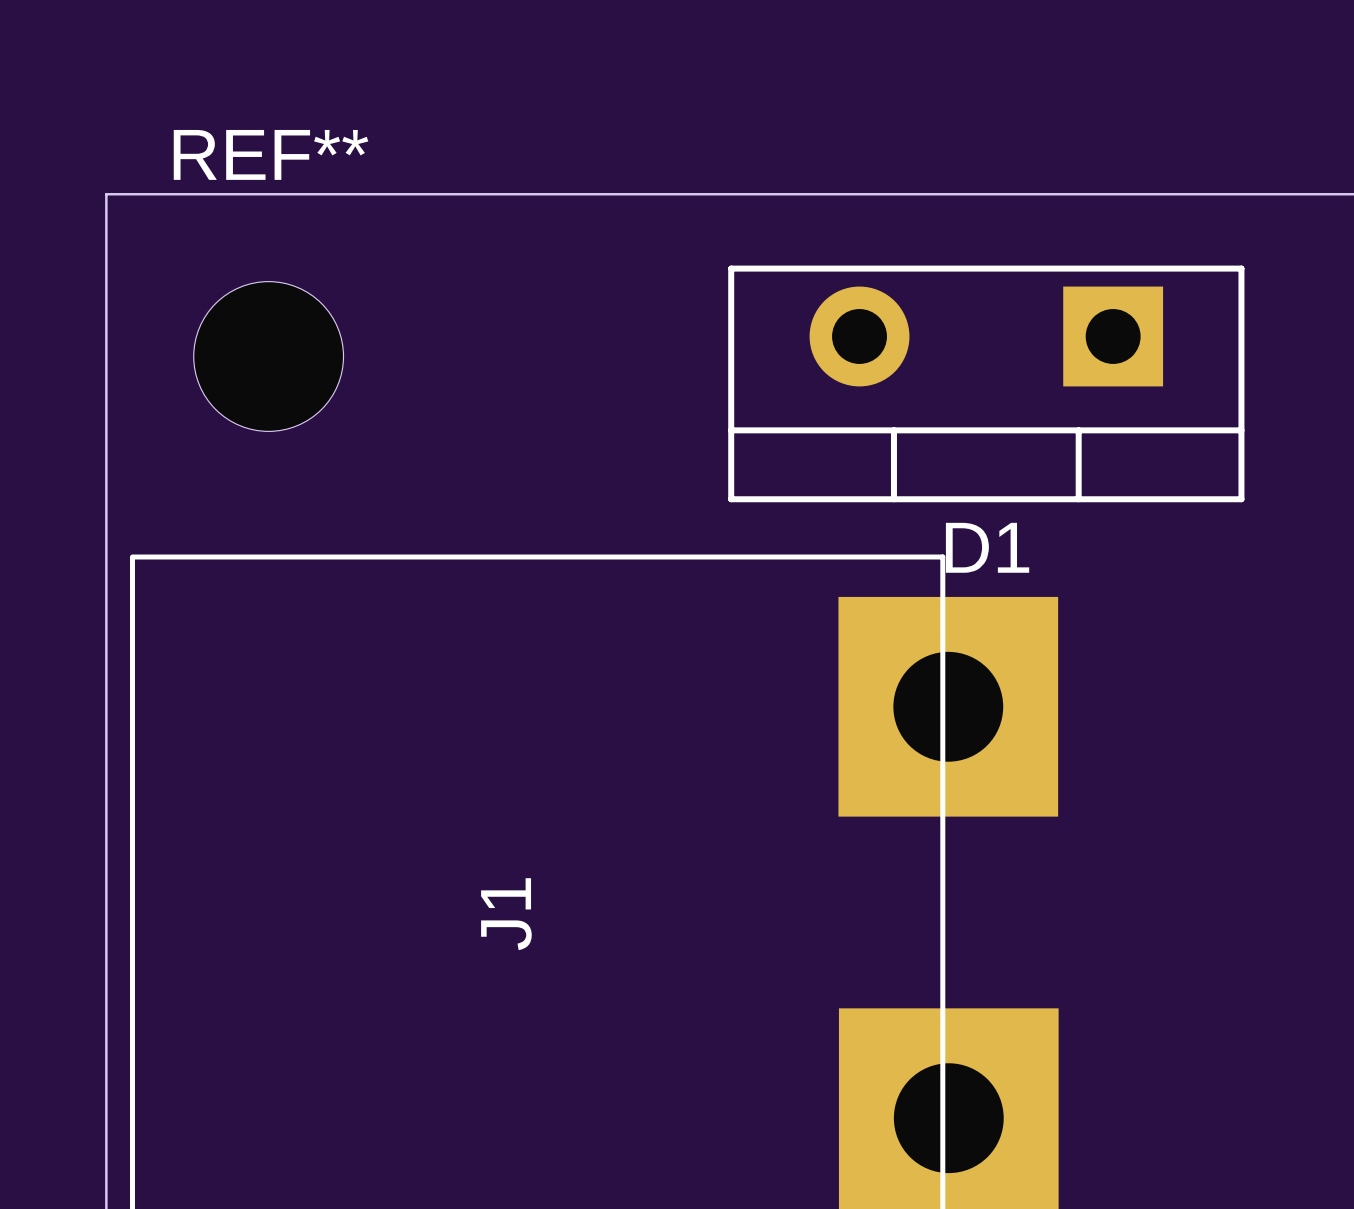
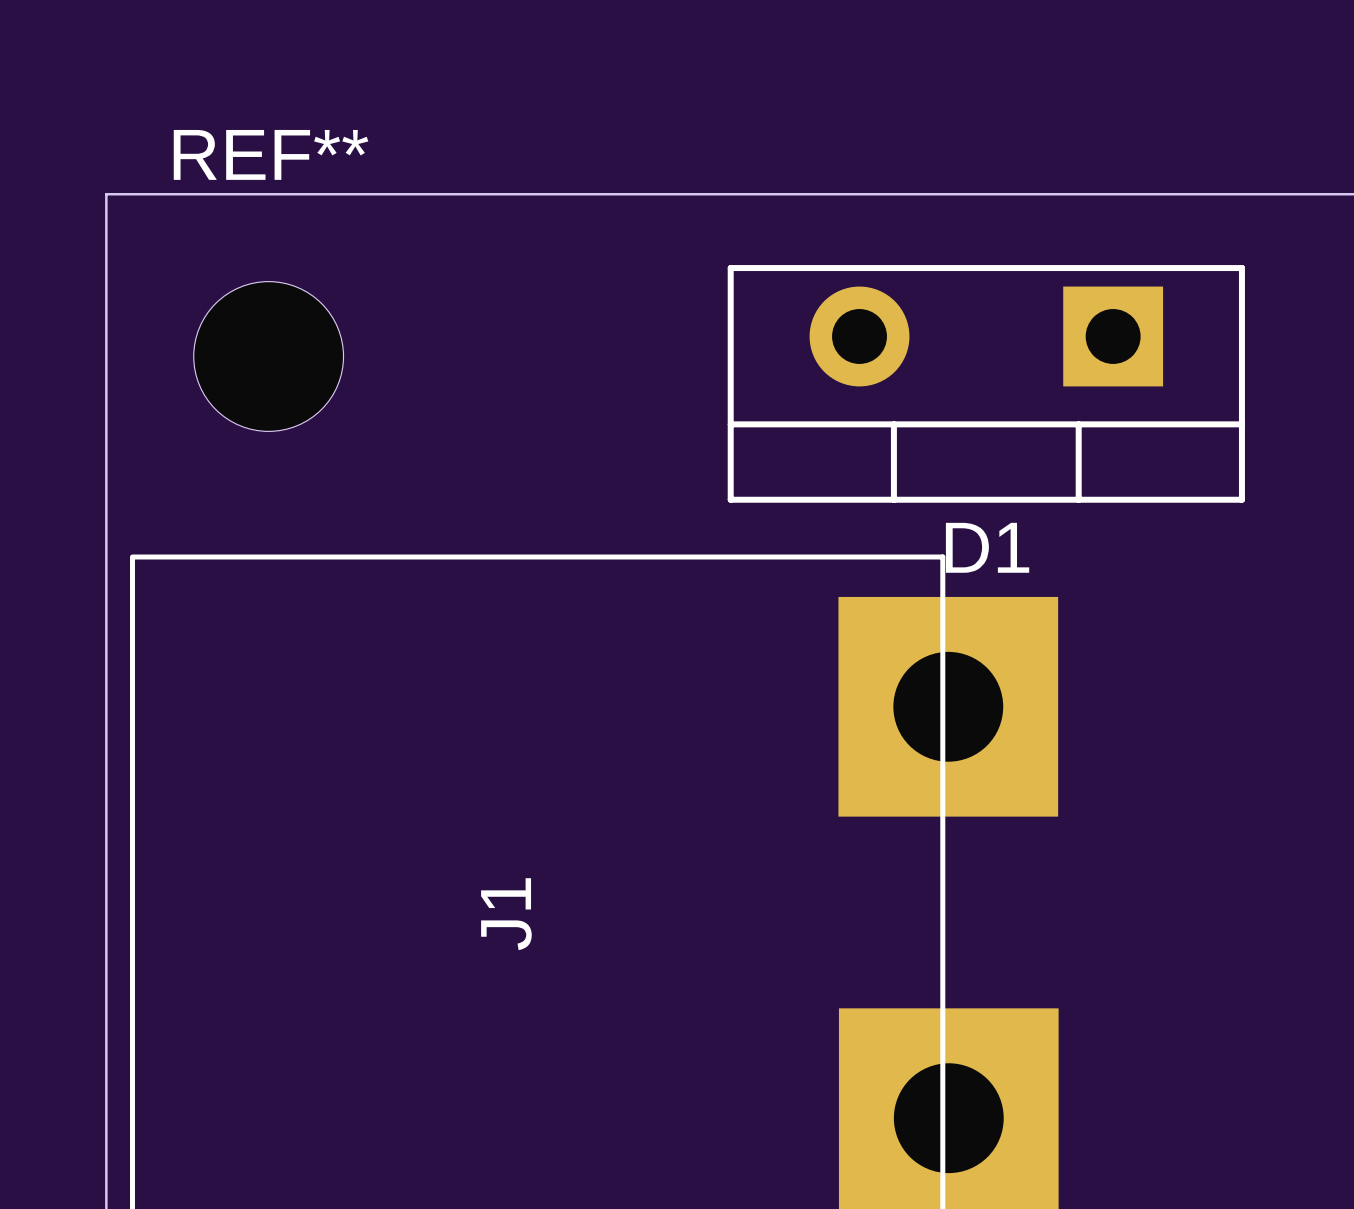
D1 footprint: [728, 265, 1245, 503] -> [727, 265, 1245, 503]

